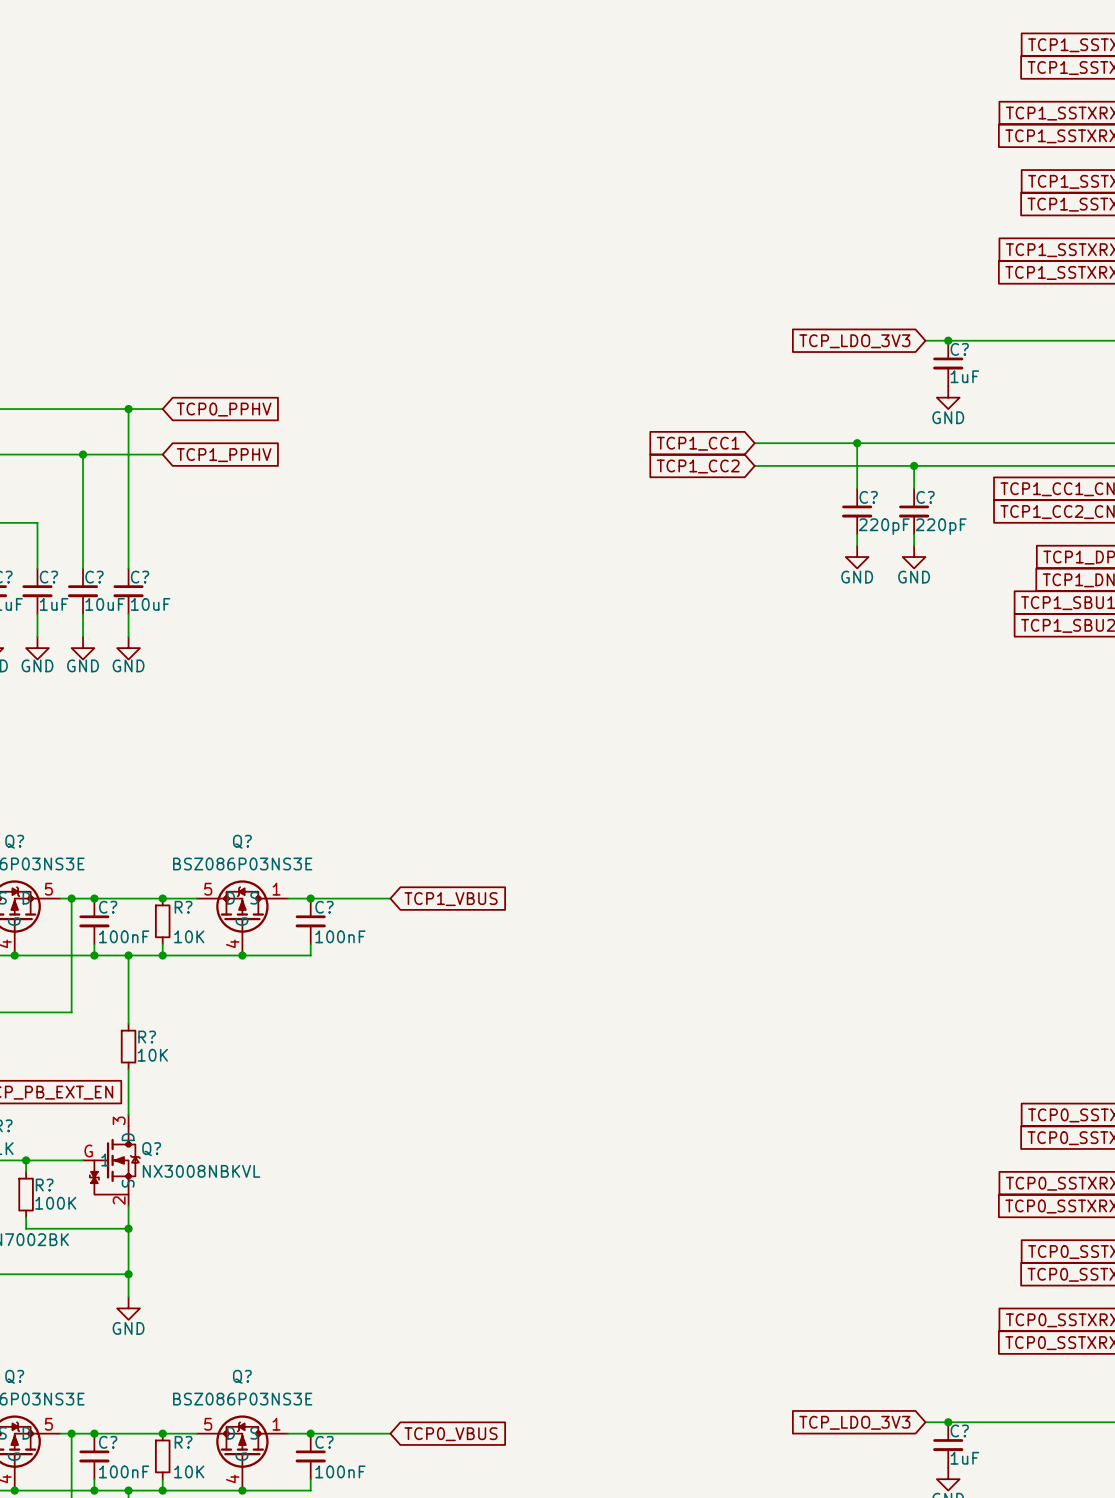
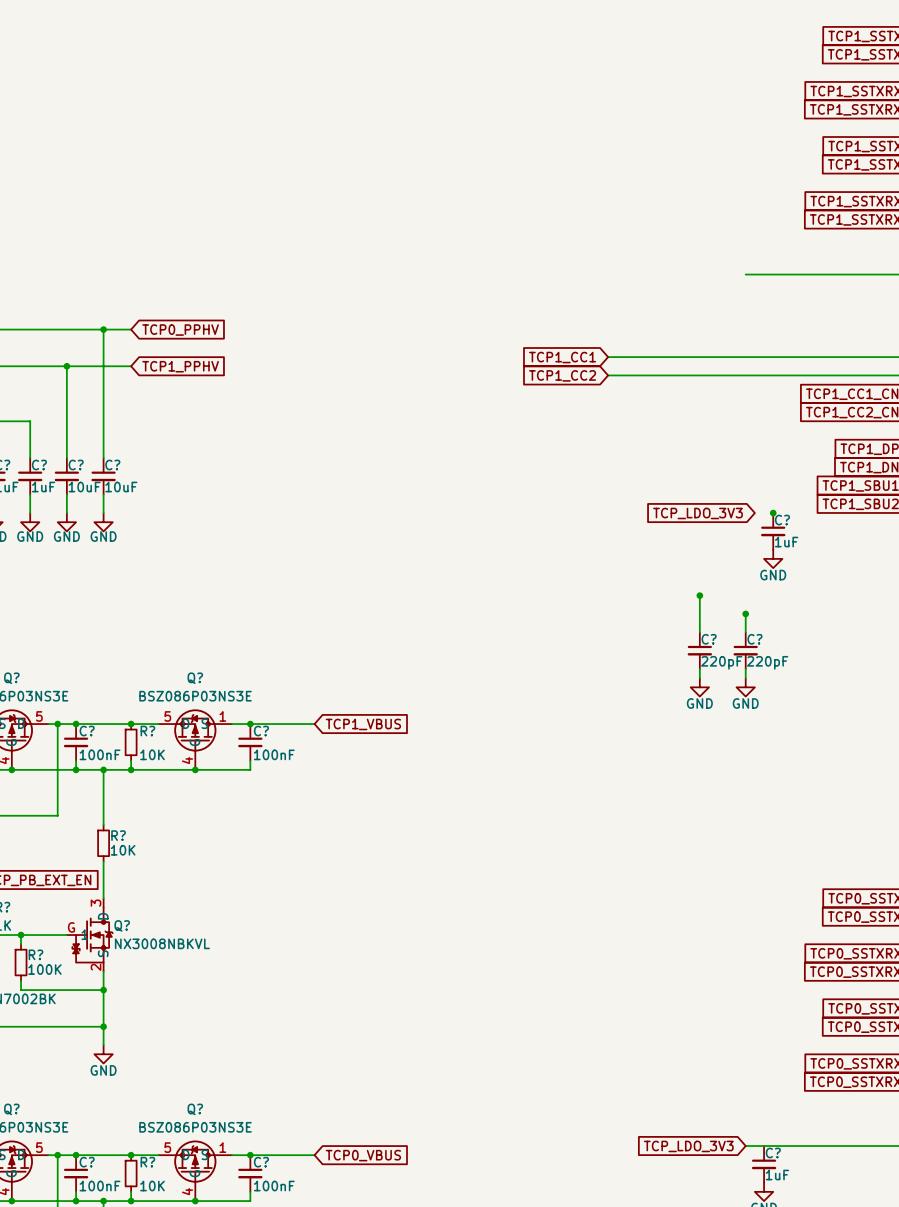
junction: (948, 340) -> none
global label: TCP_LDO_3V3 (854, 341) -> none
C?: 1uF (948, 363) -> none
power symbol: GND (948, 397) -> none
wire: (857, 443) (857, 488) -> none
junction: (857, 443) -> none
wire: (914, 465) (914, 488) -> none
junction: (914, 465) -> none
C?: 220pF (857, 511) -> none
C?: 220pF (914, 511) -> none
wire: (857, 534) (857, 545) -> none
wire: (914, 534) (914, 545) -> none
power symbol: GND (857, 557) -> none
power symbol: GND (914, 557) -> none
junction: none -> (773, 513)
global label: none -> TCP_LDO_3V3 (697, 513)
C?: none -> 1uF (773, 531)
power symbol: none -> GND (773, 558)
wire: none -> (699, 595) (699, 632)
junction: none -> (699, 595)
wire: none -> (745, 613) (745, 632)
junction: none -> (745, 613)
C?: none -> 220pF (699, 650)
C?: none -> 220pF (745, 650)
wire: none -> (699, 668) (699, 678)
wire: none -> (745, 668) (745, 678)
power symbol: none -> GND (699, 687)
power symbol: none -> GND (745, 687)
junction: (948, 1422) -> none

